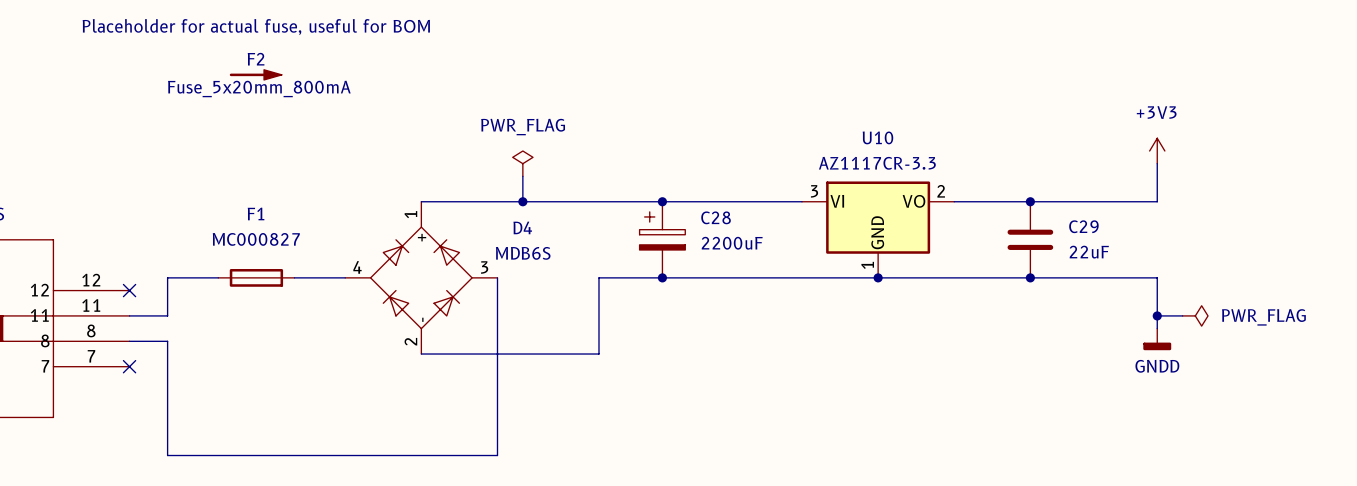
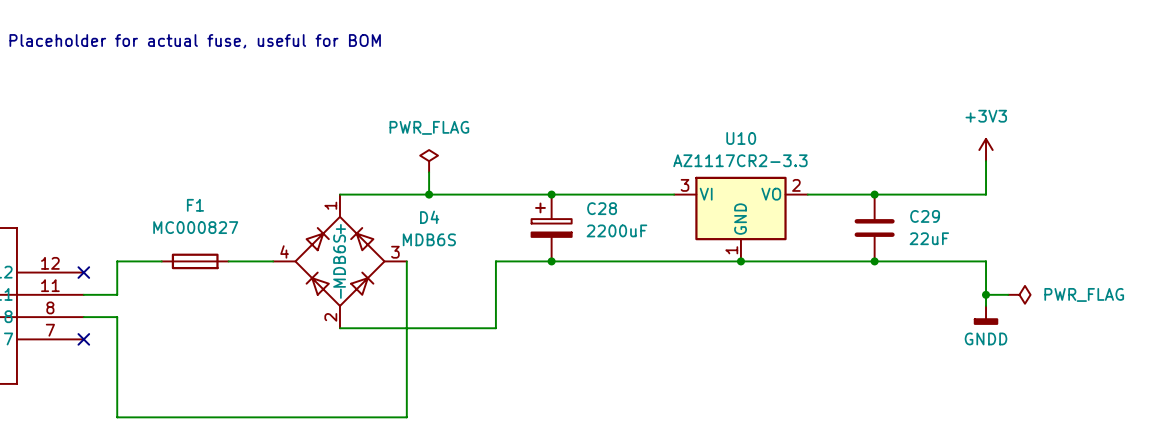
F2: Fuse_5x20mm_800mA (255, 74) -> none
U10 value: AZ1117CR-3.3 (877, 163) -> AZ1117CR2-3.3 (740, 160)
D4 text: none -> MDB6S (339, 261)

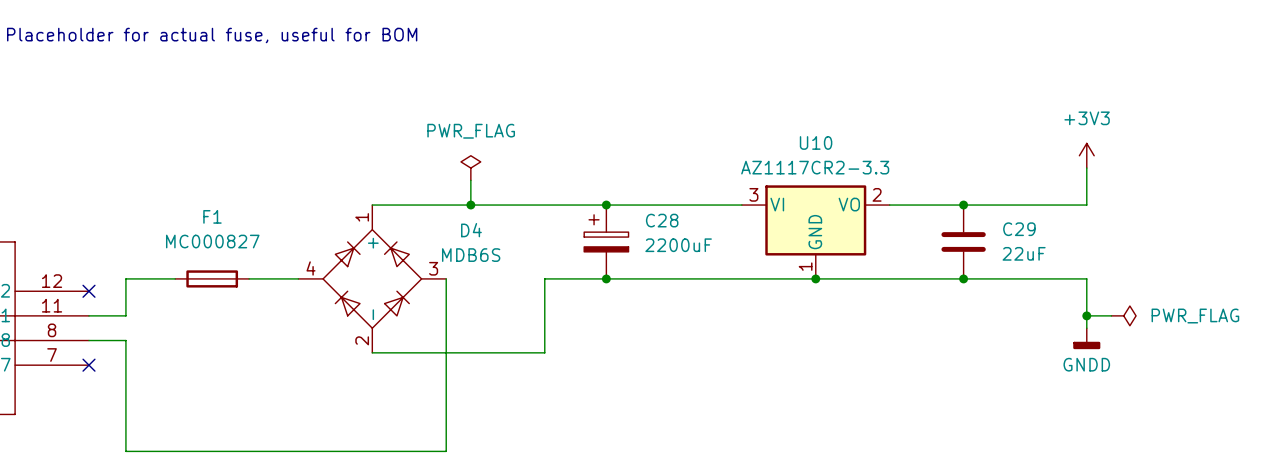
D4 text: MDB6S (339, 261) -> none

